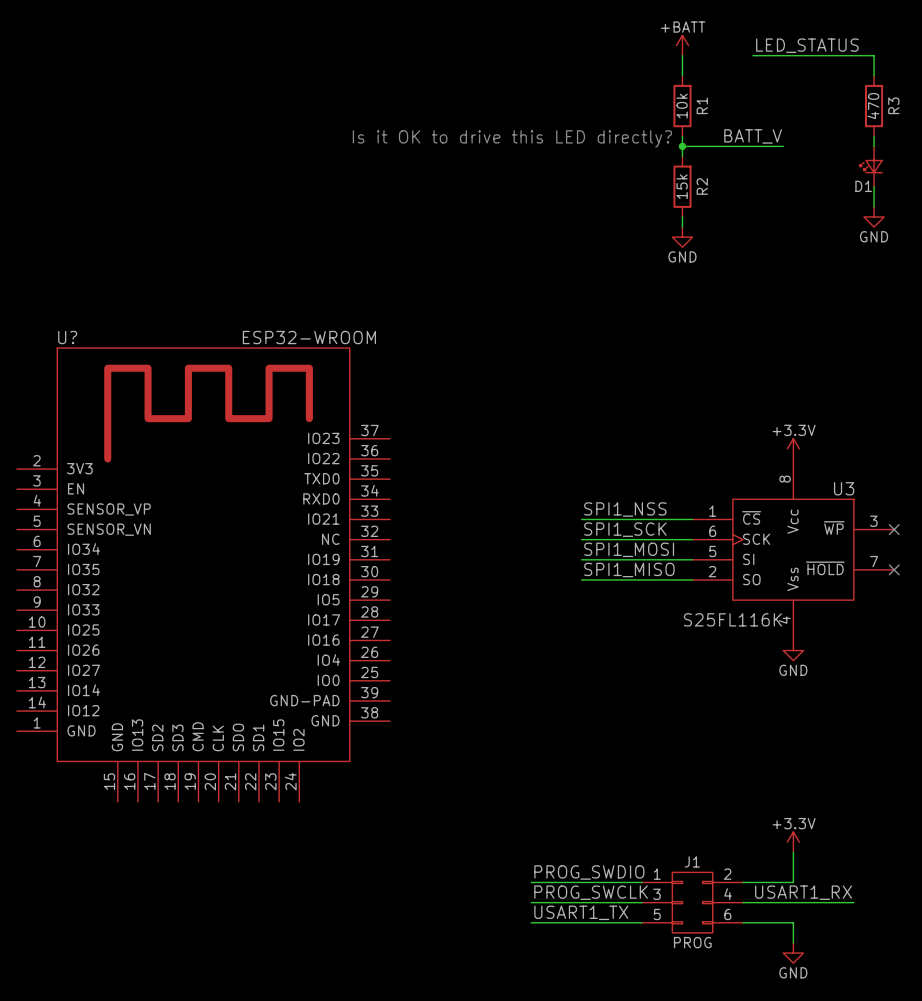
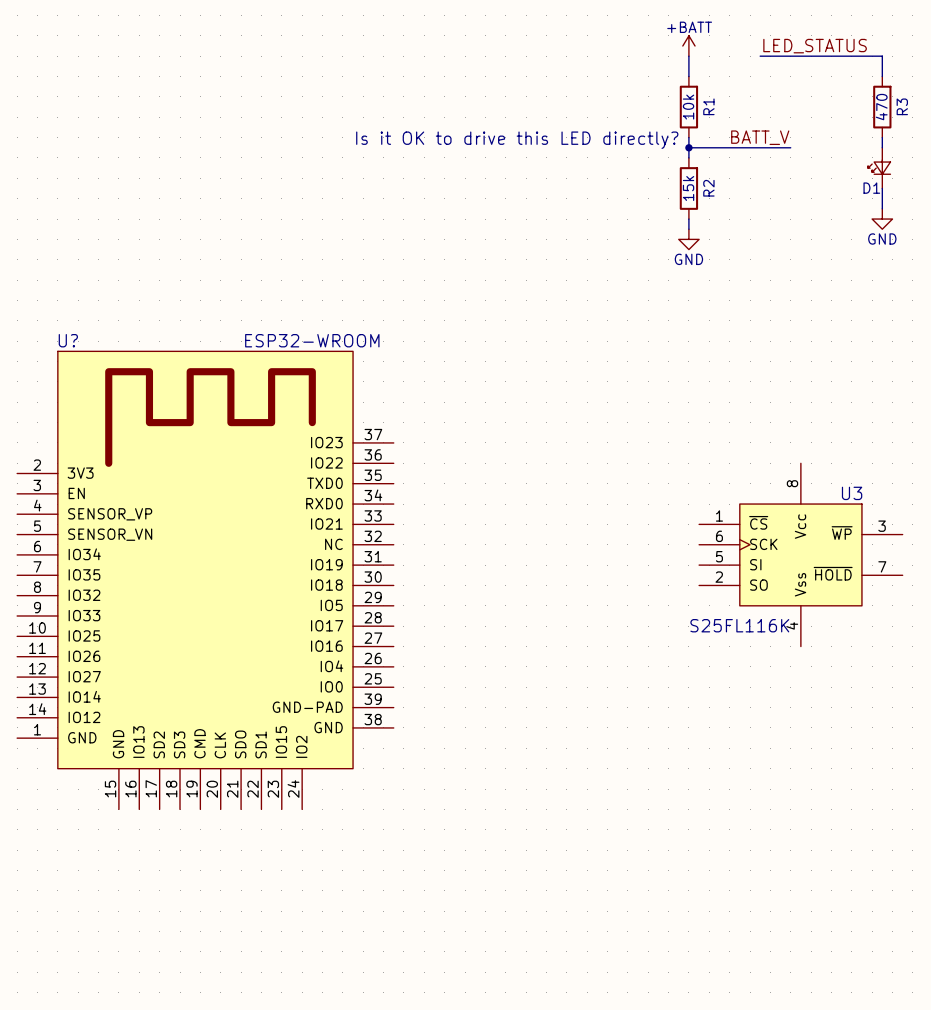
power symbol: +3.3V (793, 448) -> none
label: SPI1_NSS (625, 509) -> none
wire: (581, 519) (692, 519) -> none
label: SPI1_SCK (625, 529) -> none
no-connect mark: (894, 529) -> none
wire: (581, 539) (692, 539) -> none
label: SPI1_MOSI (629, 549) -> none
wire: (581, 559) (692, 559) -> none
label: SPI1_MISO (629, 569) -> none
no-connect mark: (894, 569) -> none
wire: (581, 579) (692, 579) -> none
power symbol: GND (793, 650) -> none
power symbol: +3.3V (793, 842) -> none
wire: (793, 852) (793, 882) (742, 882) -> none
label: PROG_SWDIO (589, 872) -> none
wire: (531, 882) (642, 882) -> none
label: PROG_SWCLK (591, 892) -> none
label: USART1_RX (803, 892) -> none
wire: (531, 902) (642, 902) -> none
J1: PROG (692, 902) -> none
wire: (742, 902) (853, 902) -> none
label: USART1_TX (581, 912) -> none
wire: (531, 922) (642, 922) -> none
wire: (742, 922) (793, 922) (793, 942) -> none
power symbol: GND (793, 953) -> none

